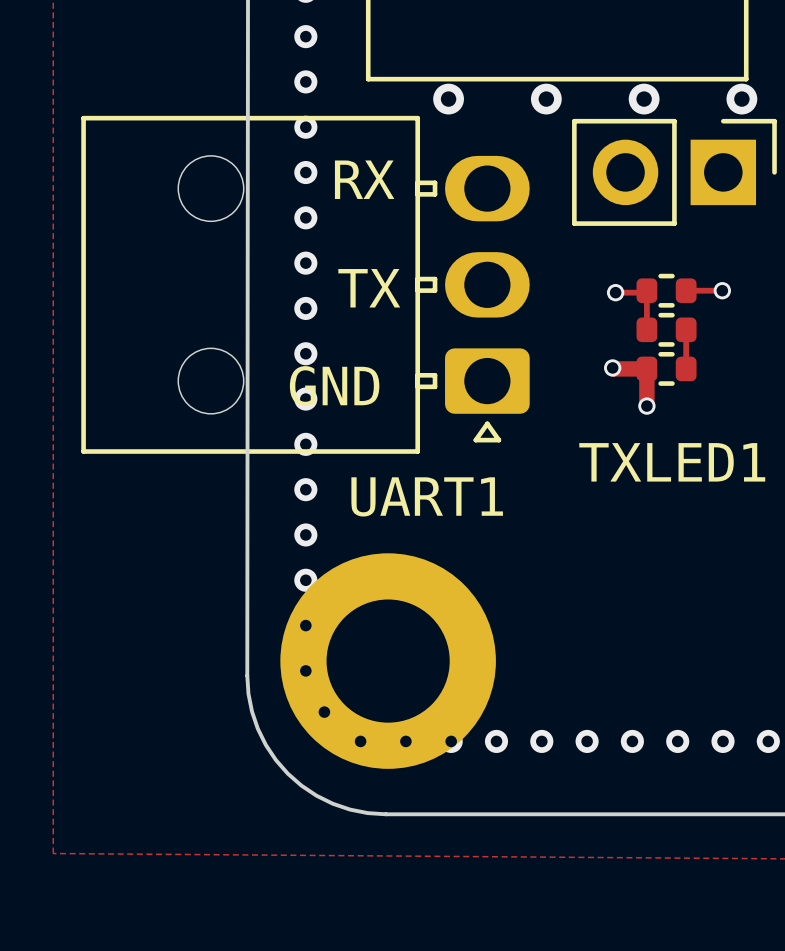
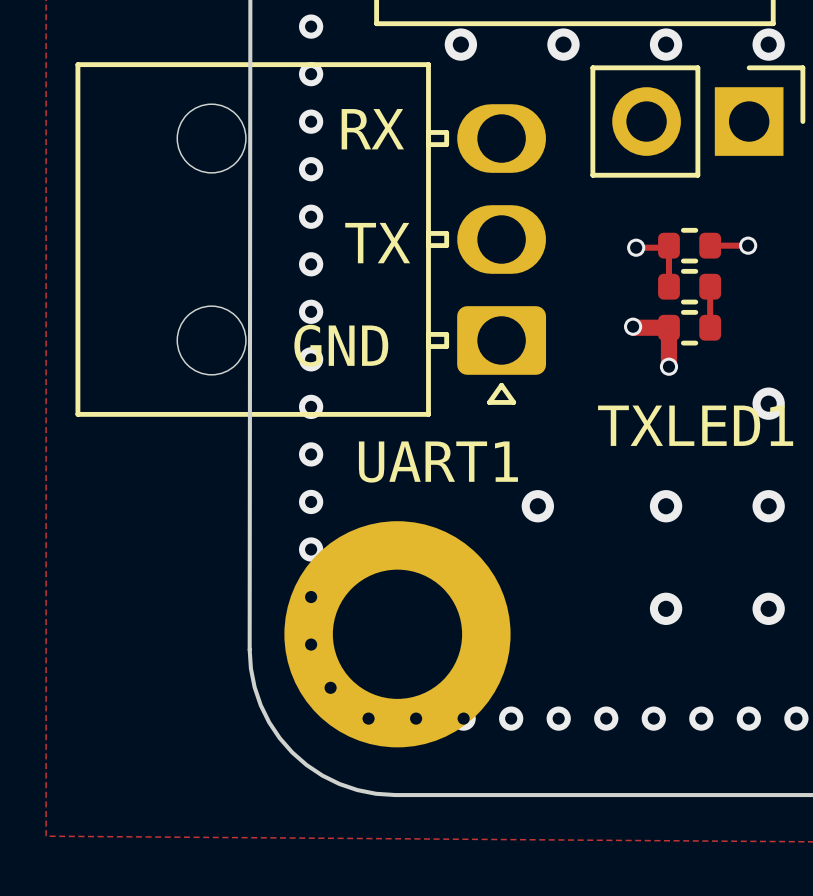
via: none -> (768, 403)
via: none -> (537, 506)
via: none -> (666, 506)
via: none -> (768, 506)
via: none -> (666, 608)
via: none -> (768, 608)

